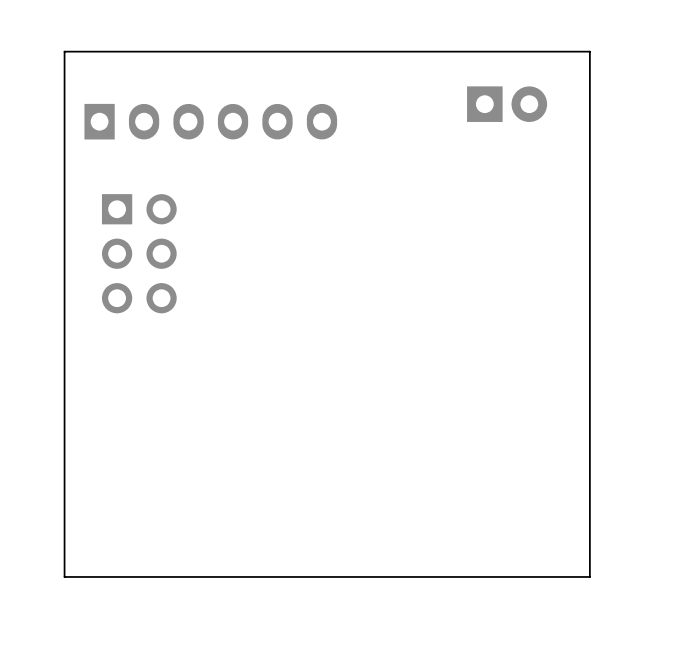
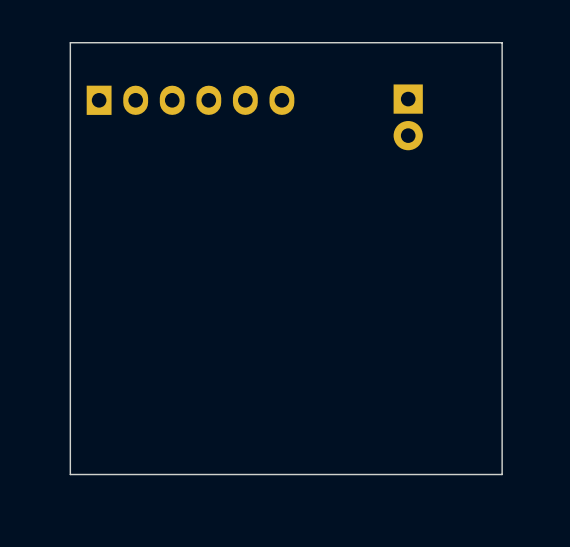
part rotation: 0° (507, 104) -> 90° clockwise (408, 117)
part position: (507, 104) -> (408, 117)
part: (139, 253) -> none

